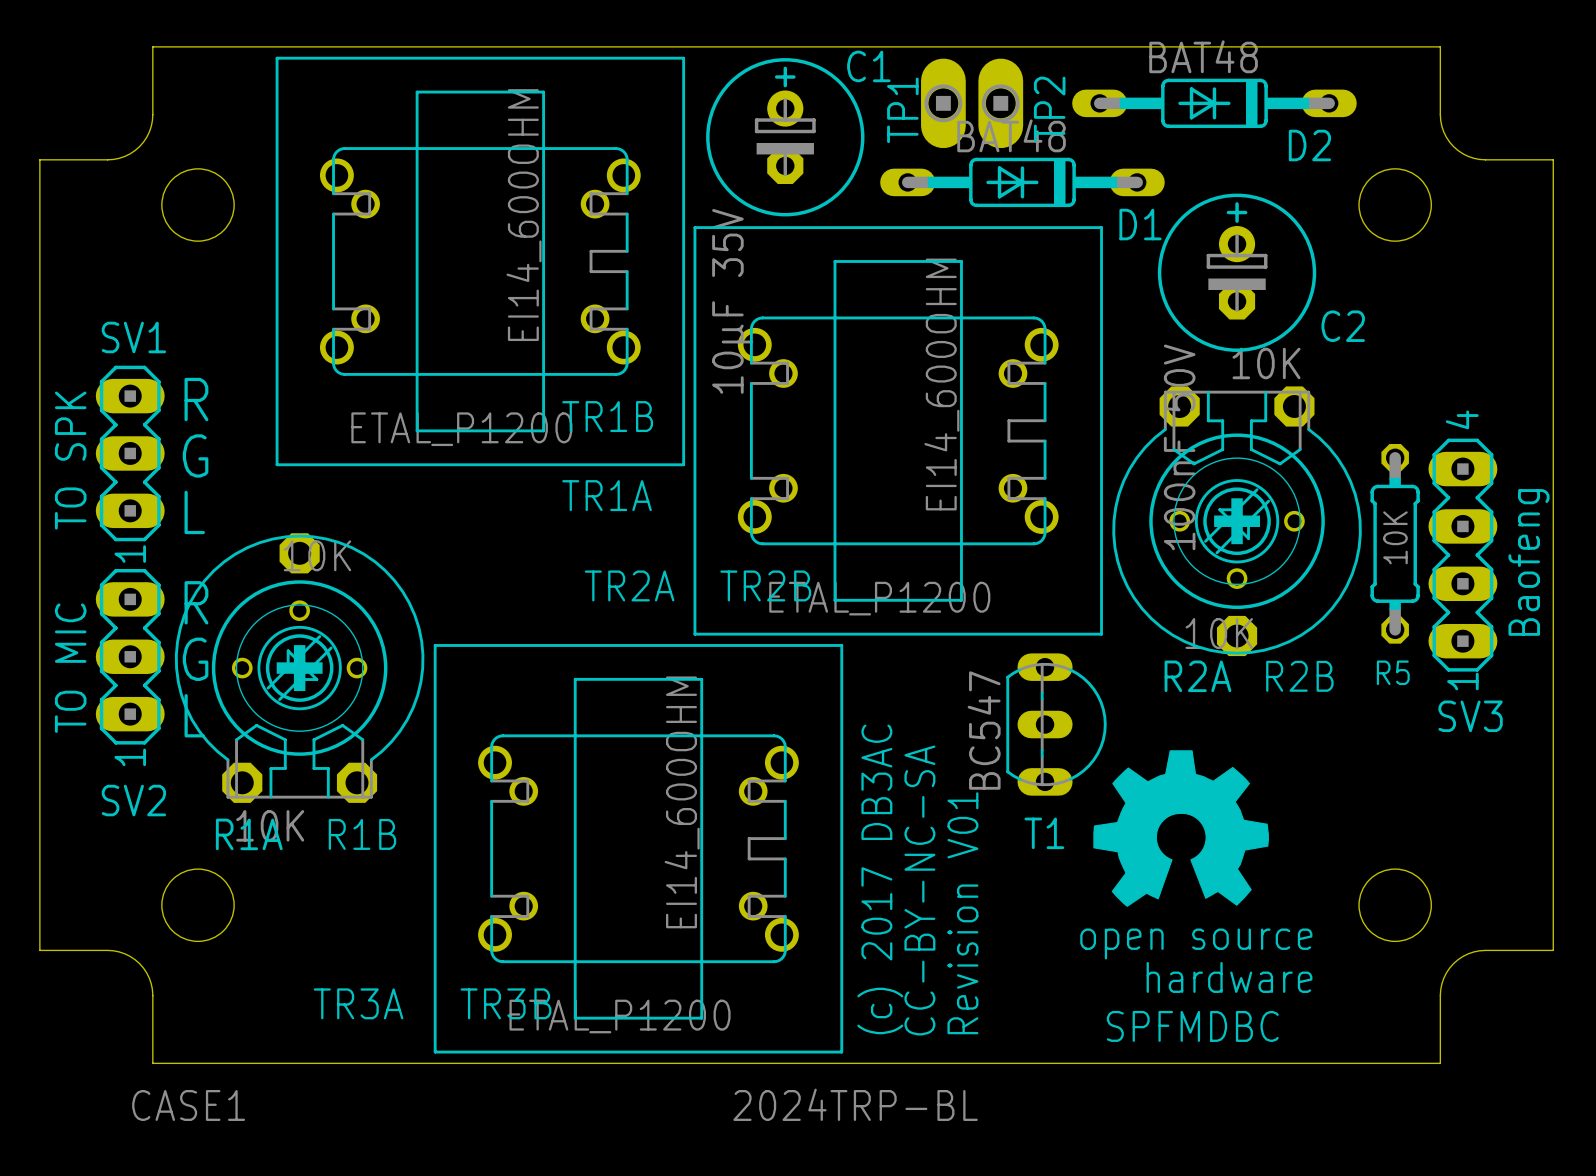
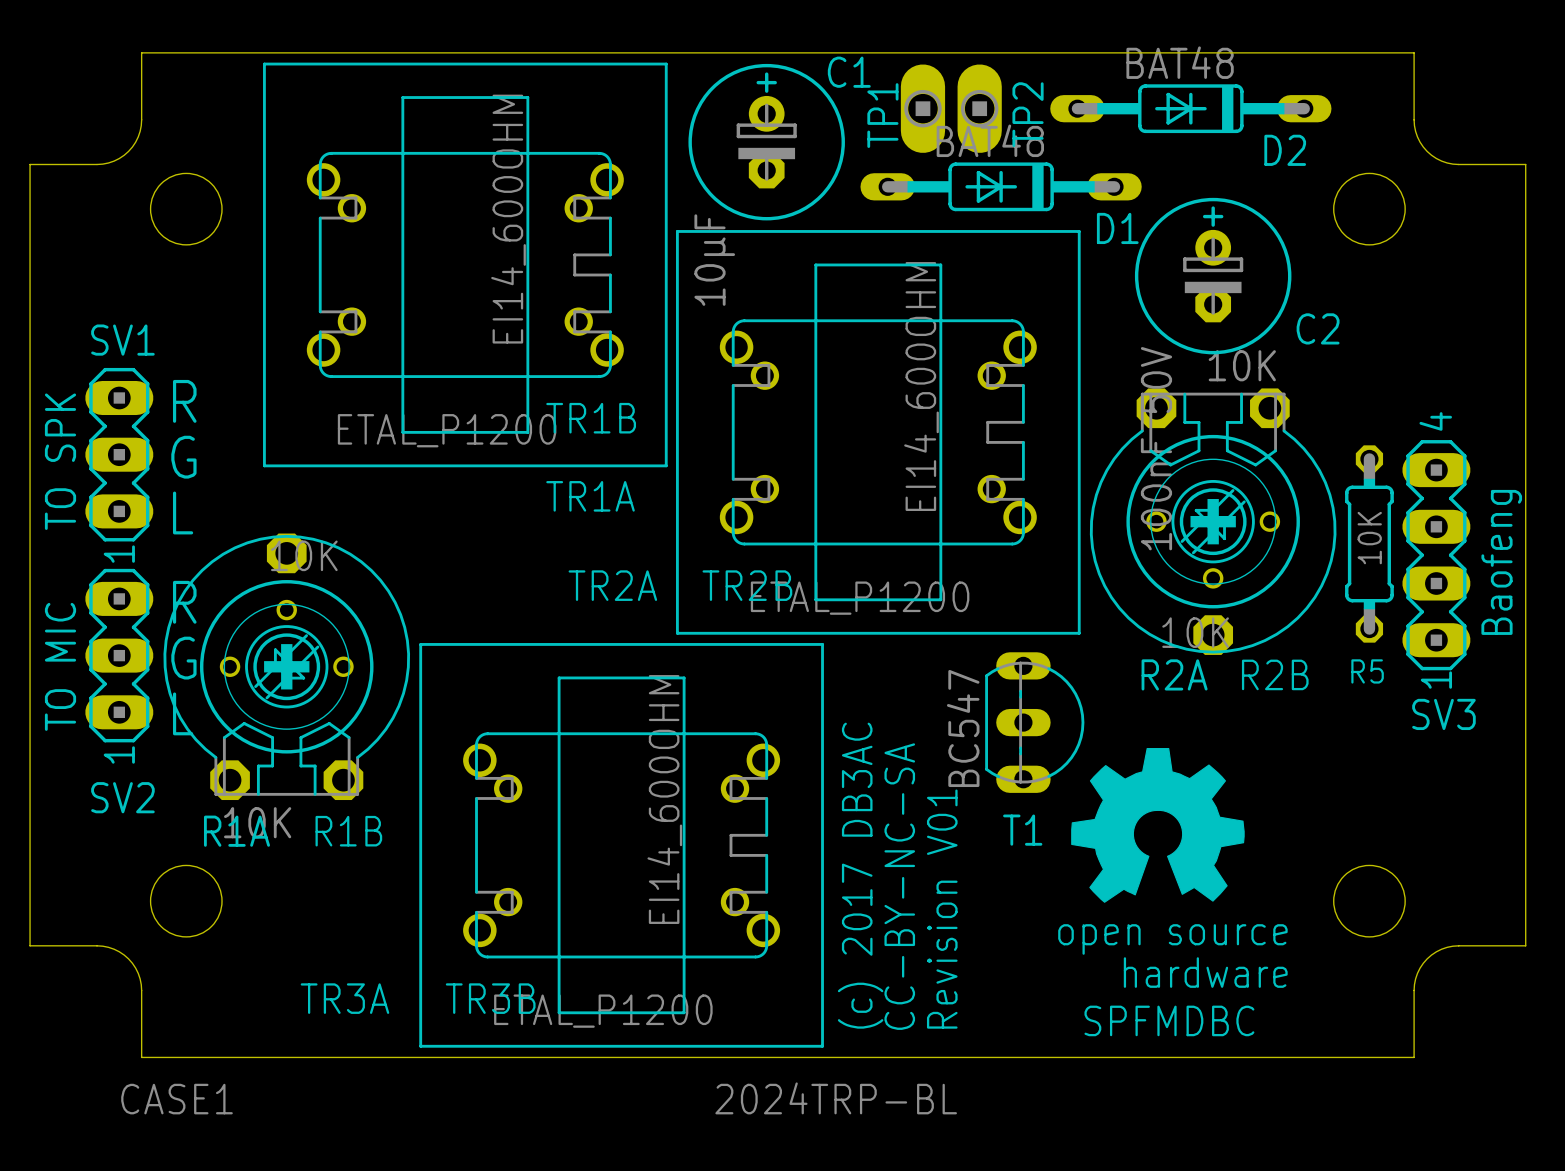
C1 value: 10µF 35V (732, 301) -> 10µF (714, 260)

